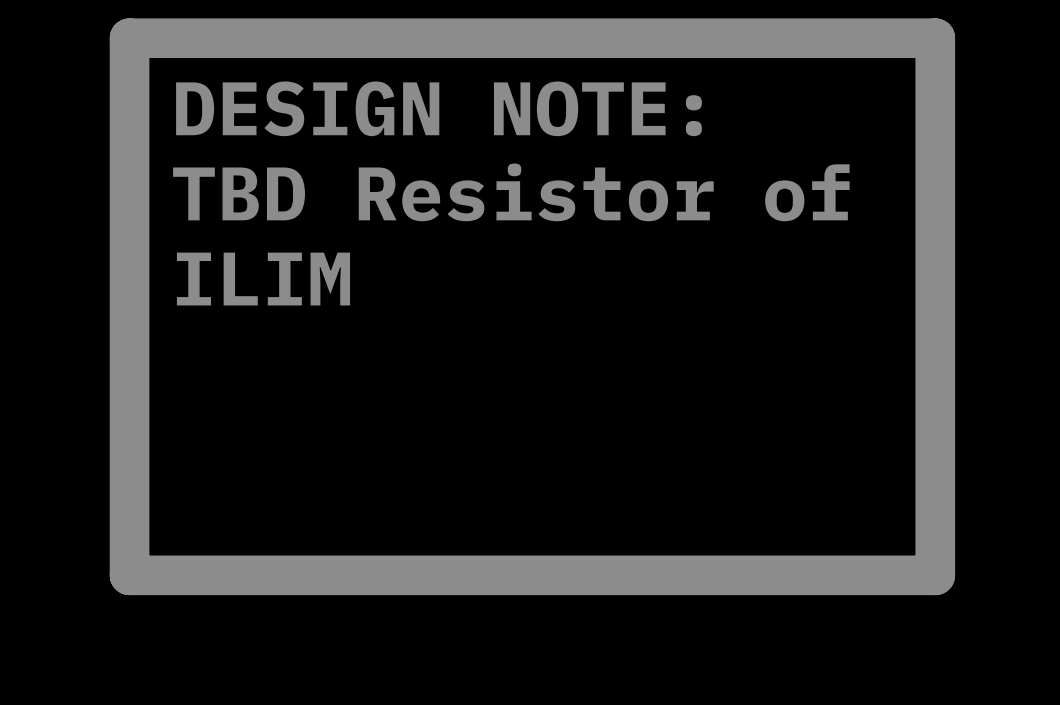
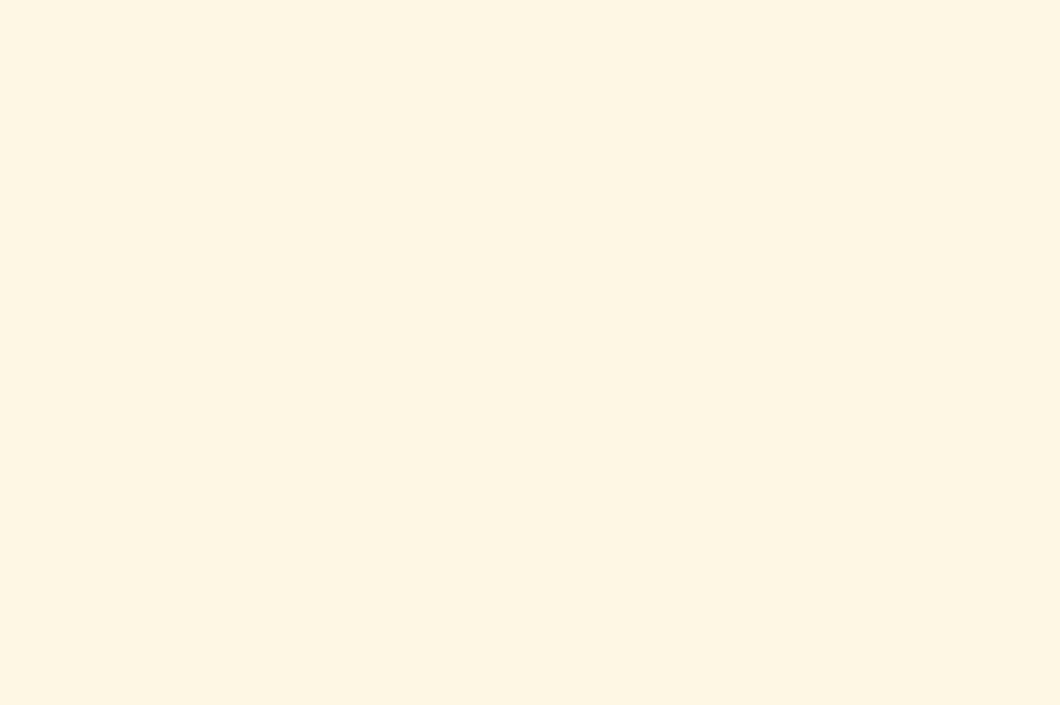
line: (129, 38) (935, 38) (935, 575) (129, 575) (129, 38) -> none
text: DESIGN NOTE: (438, 108) -> none
text: TBD Resistor of (511, 192) -> none
text: ILIM (263, 279) -> none

